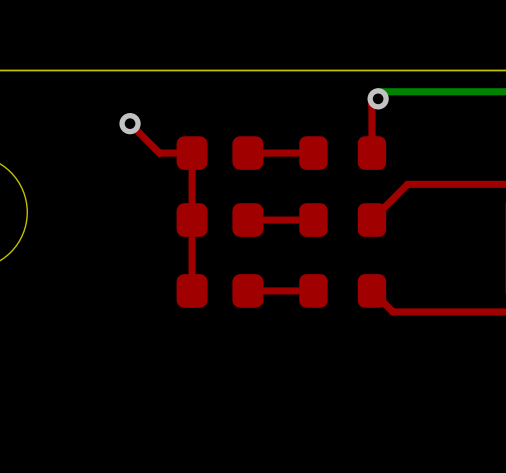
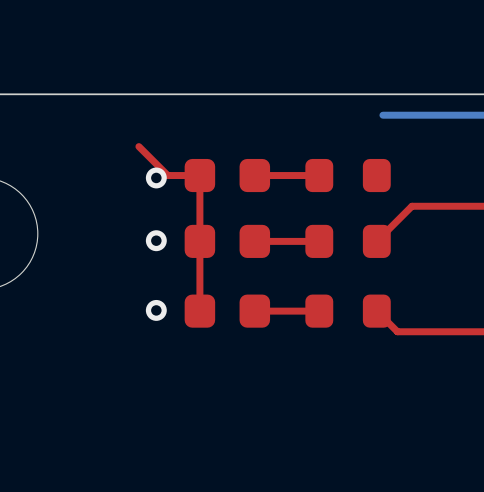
top track: (378, 98) (371, 105) (371, 153) -> none
via: (378, 98) -> none
via position: (130, 123) -> (156, 177)
via: none -> (156, 240)
via: none -> (156, 310)

